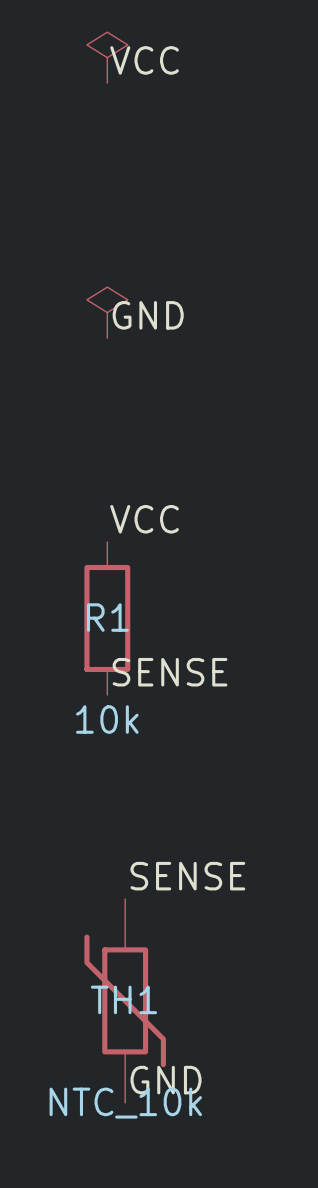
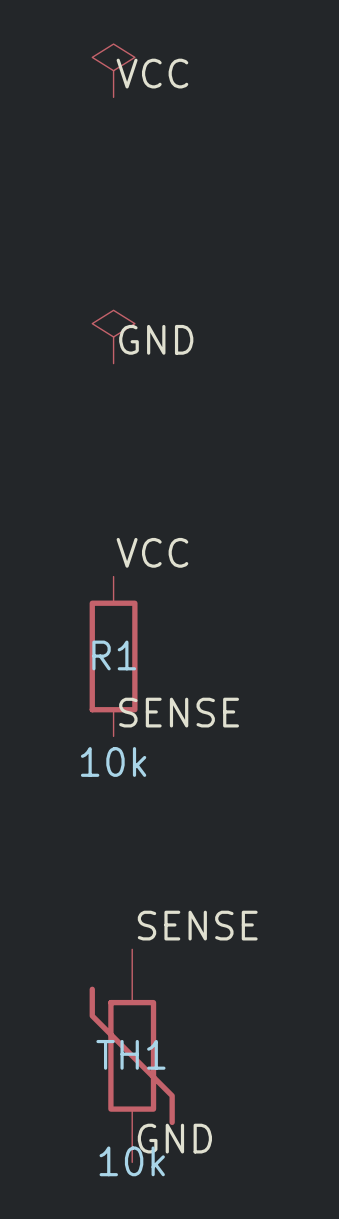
TH1 value: NTC_10k (125, 1103) -> 10k (132, 1161)

